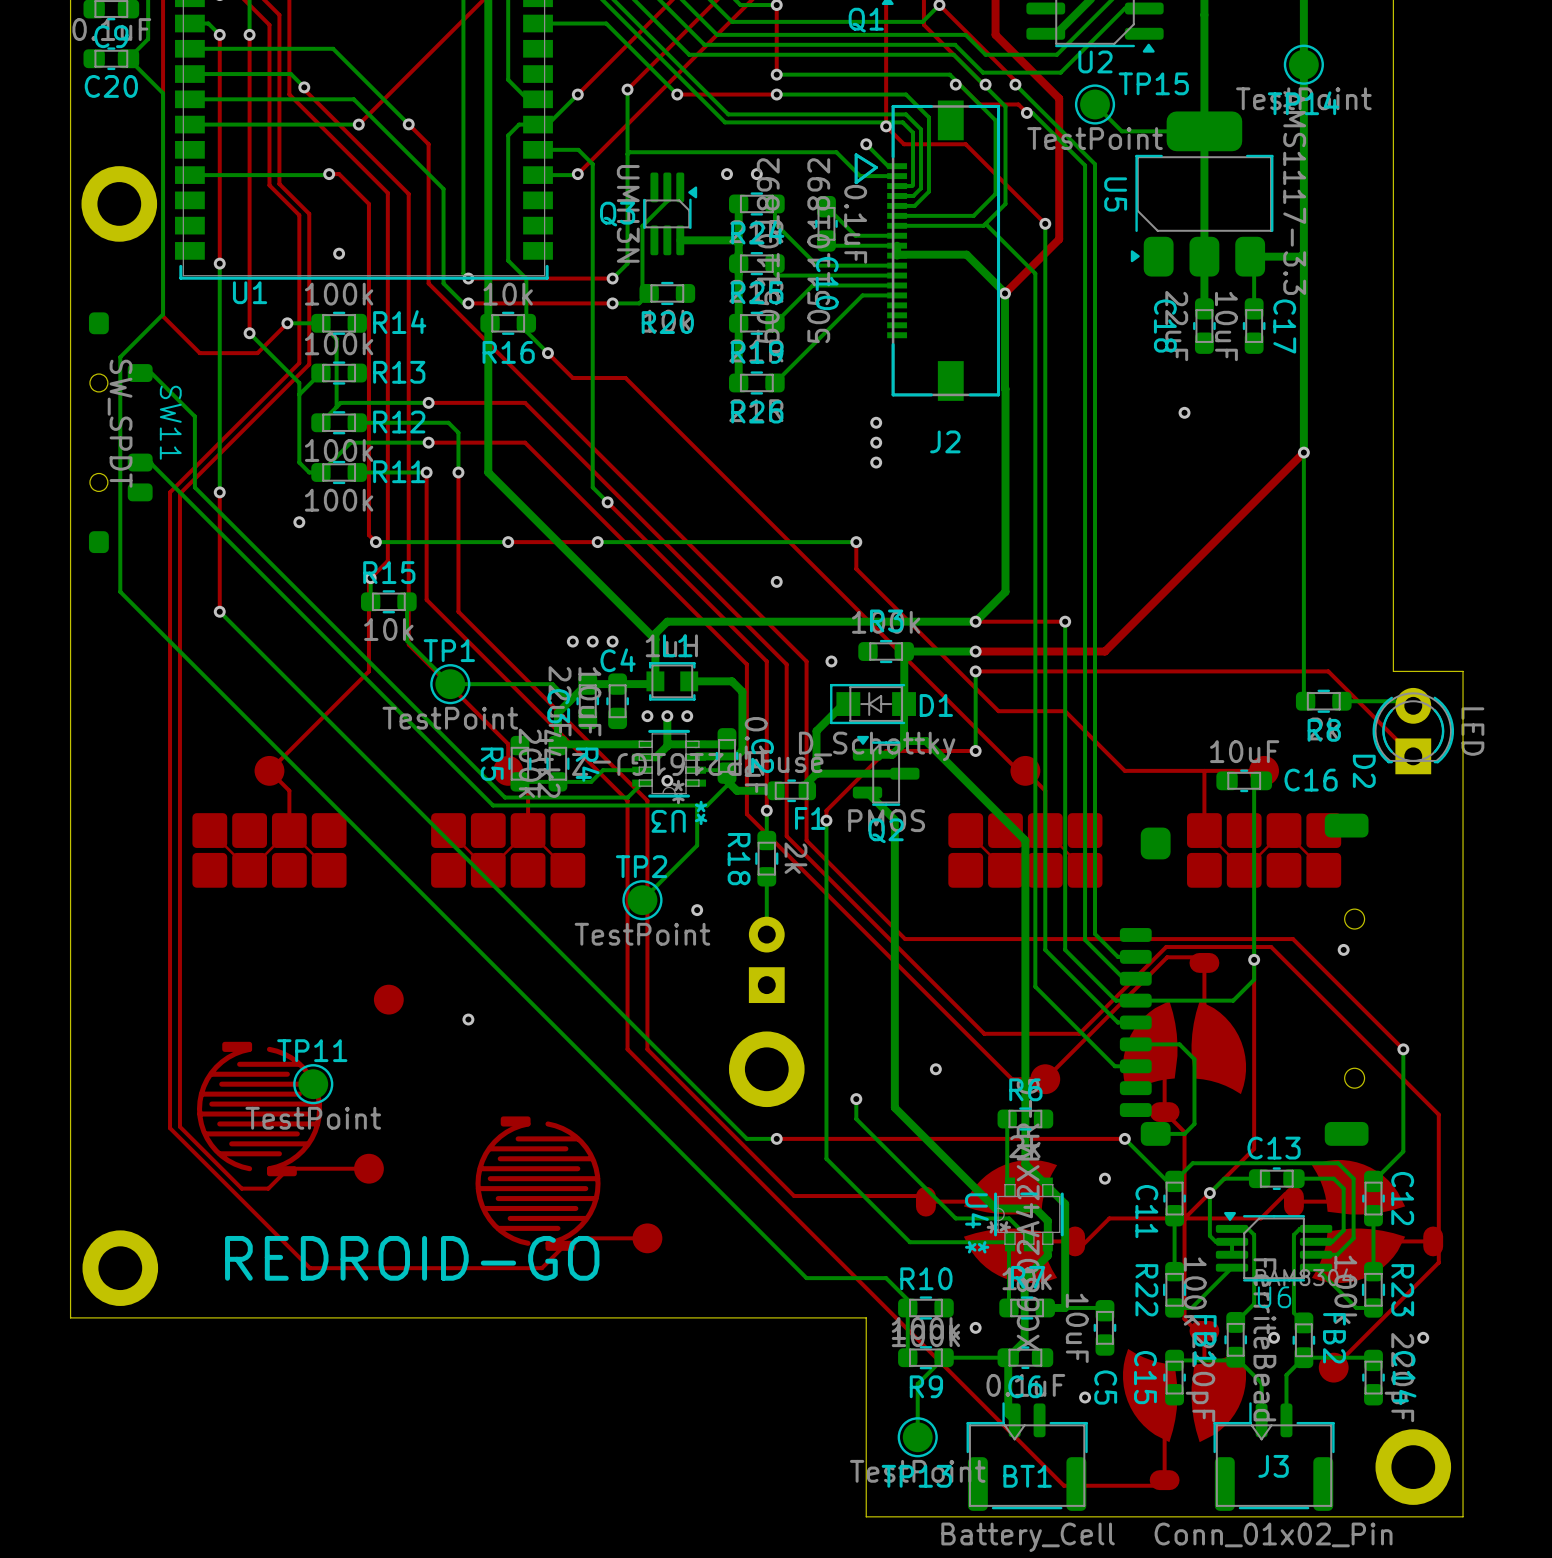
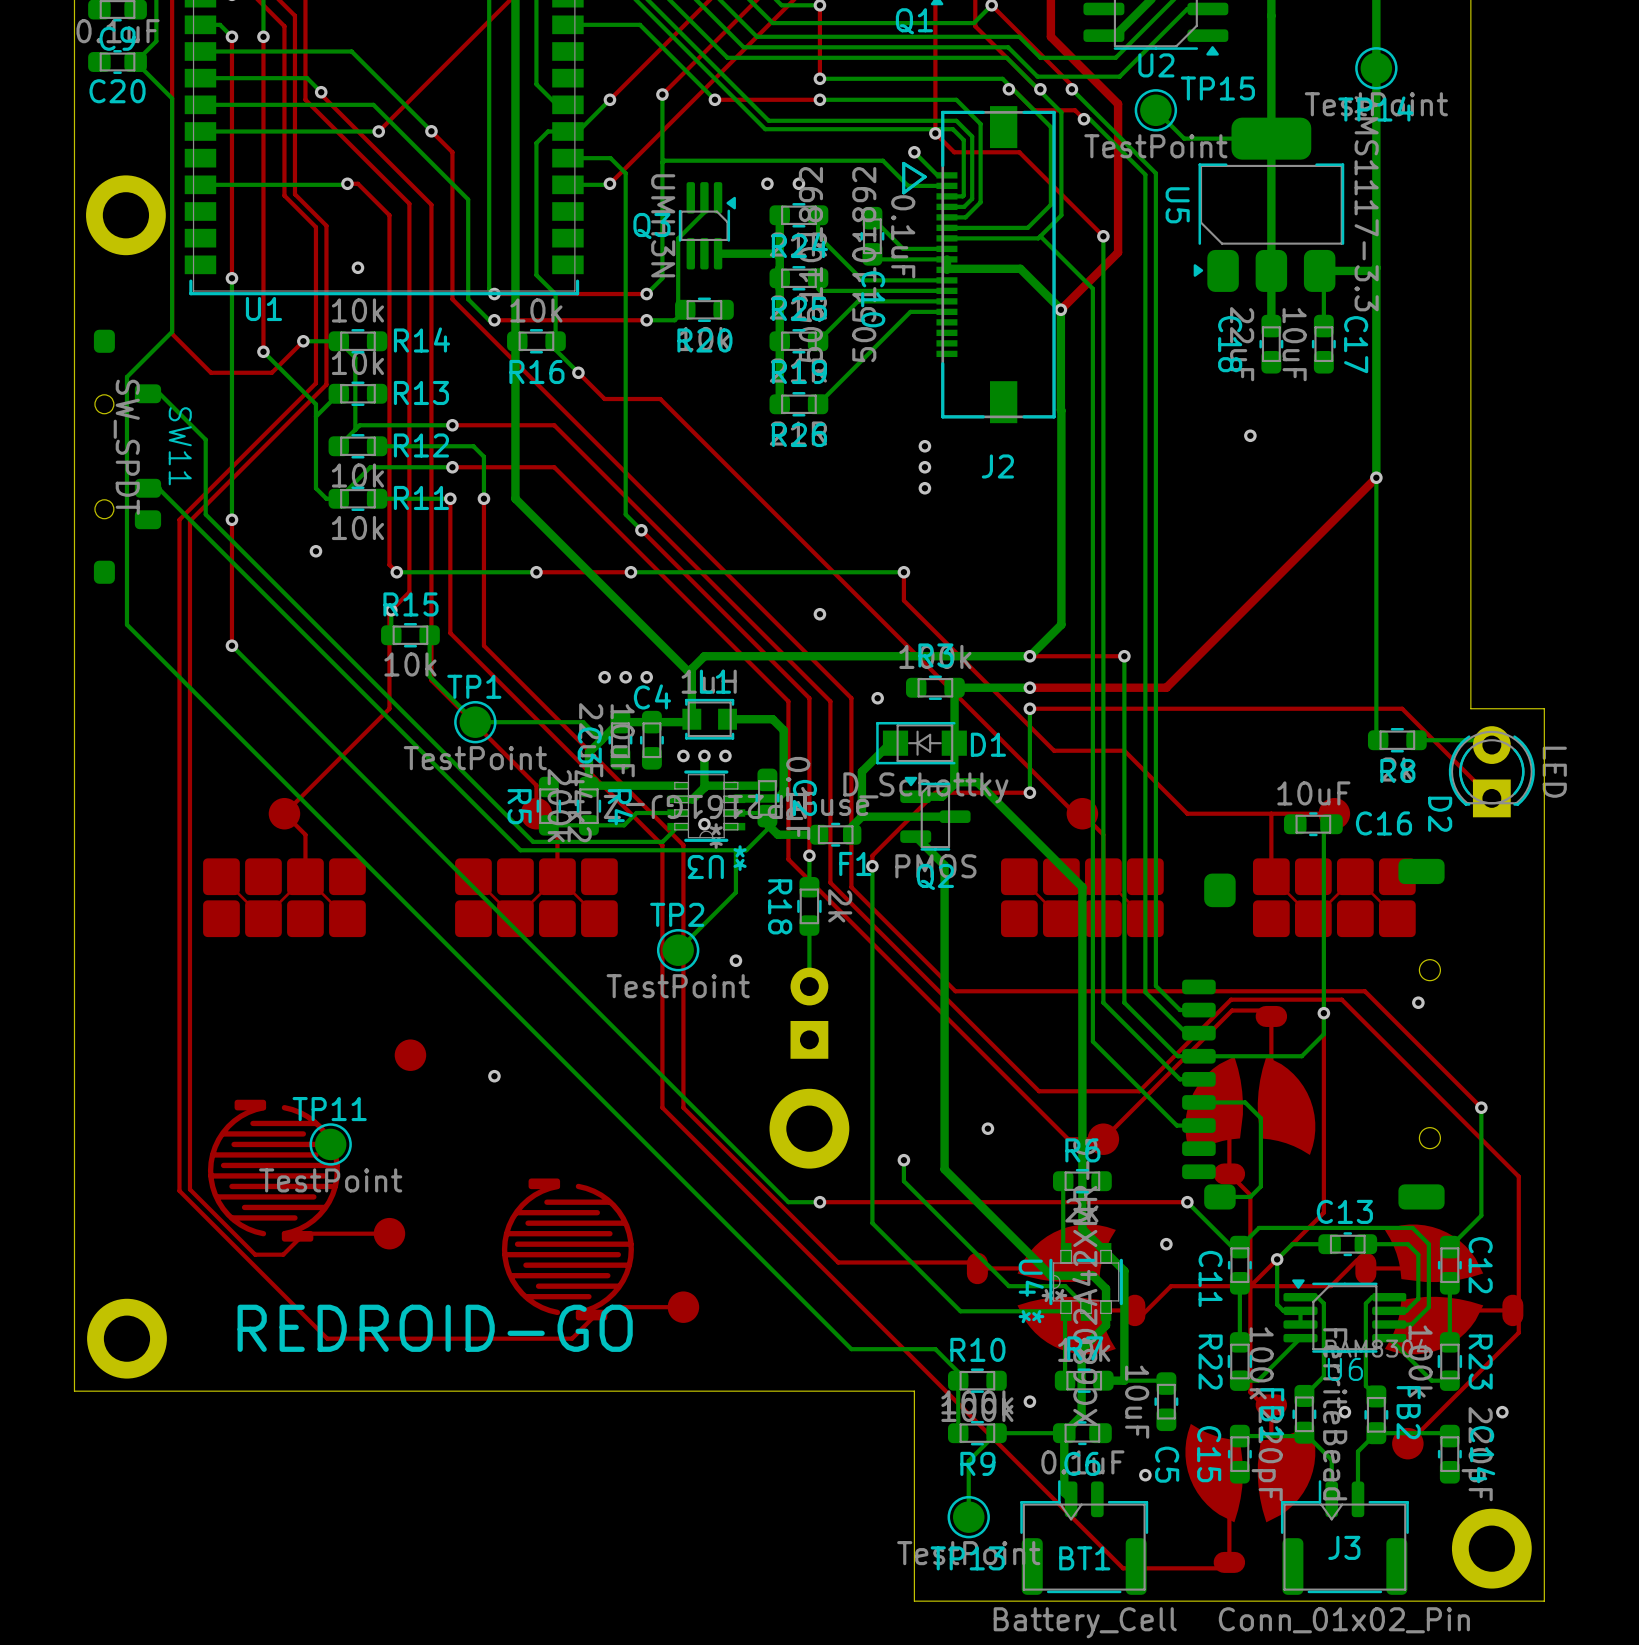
R14 value: 100k (339, 294) -> 10k (357, 310)
R13 value: 100k (339, 343) -> 10k (357, 362)
R12 value: 100k (339, 450) -> 10k (357, 475)
R11 value: 100k (339, 500) -> 10k (357, 528)

